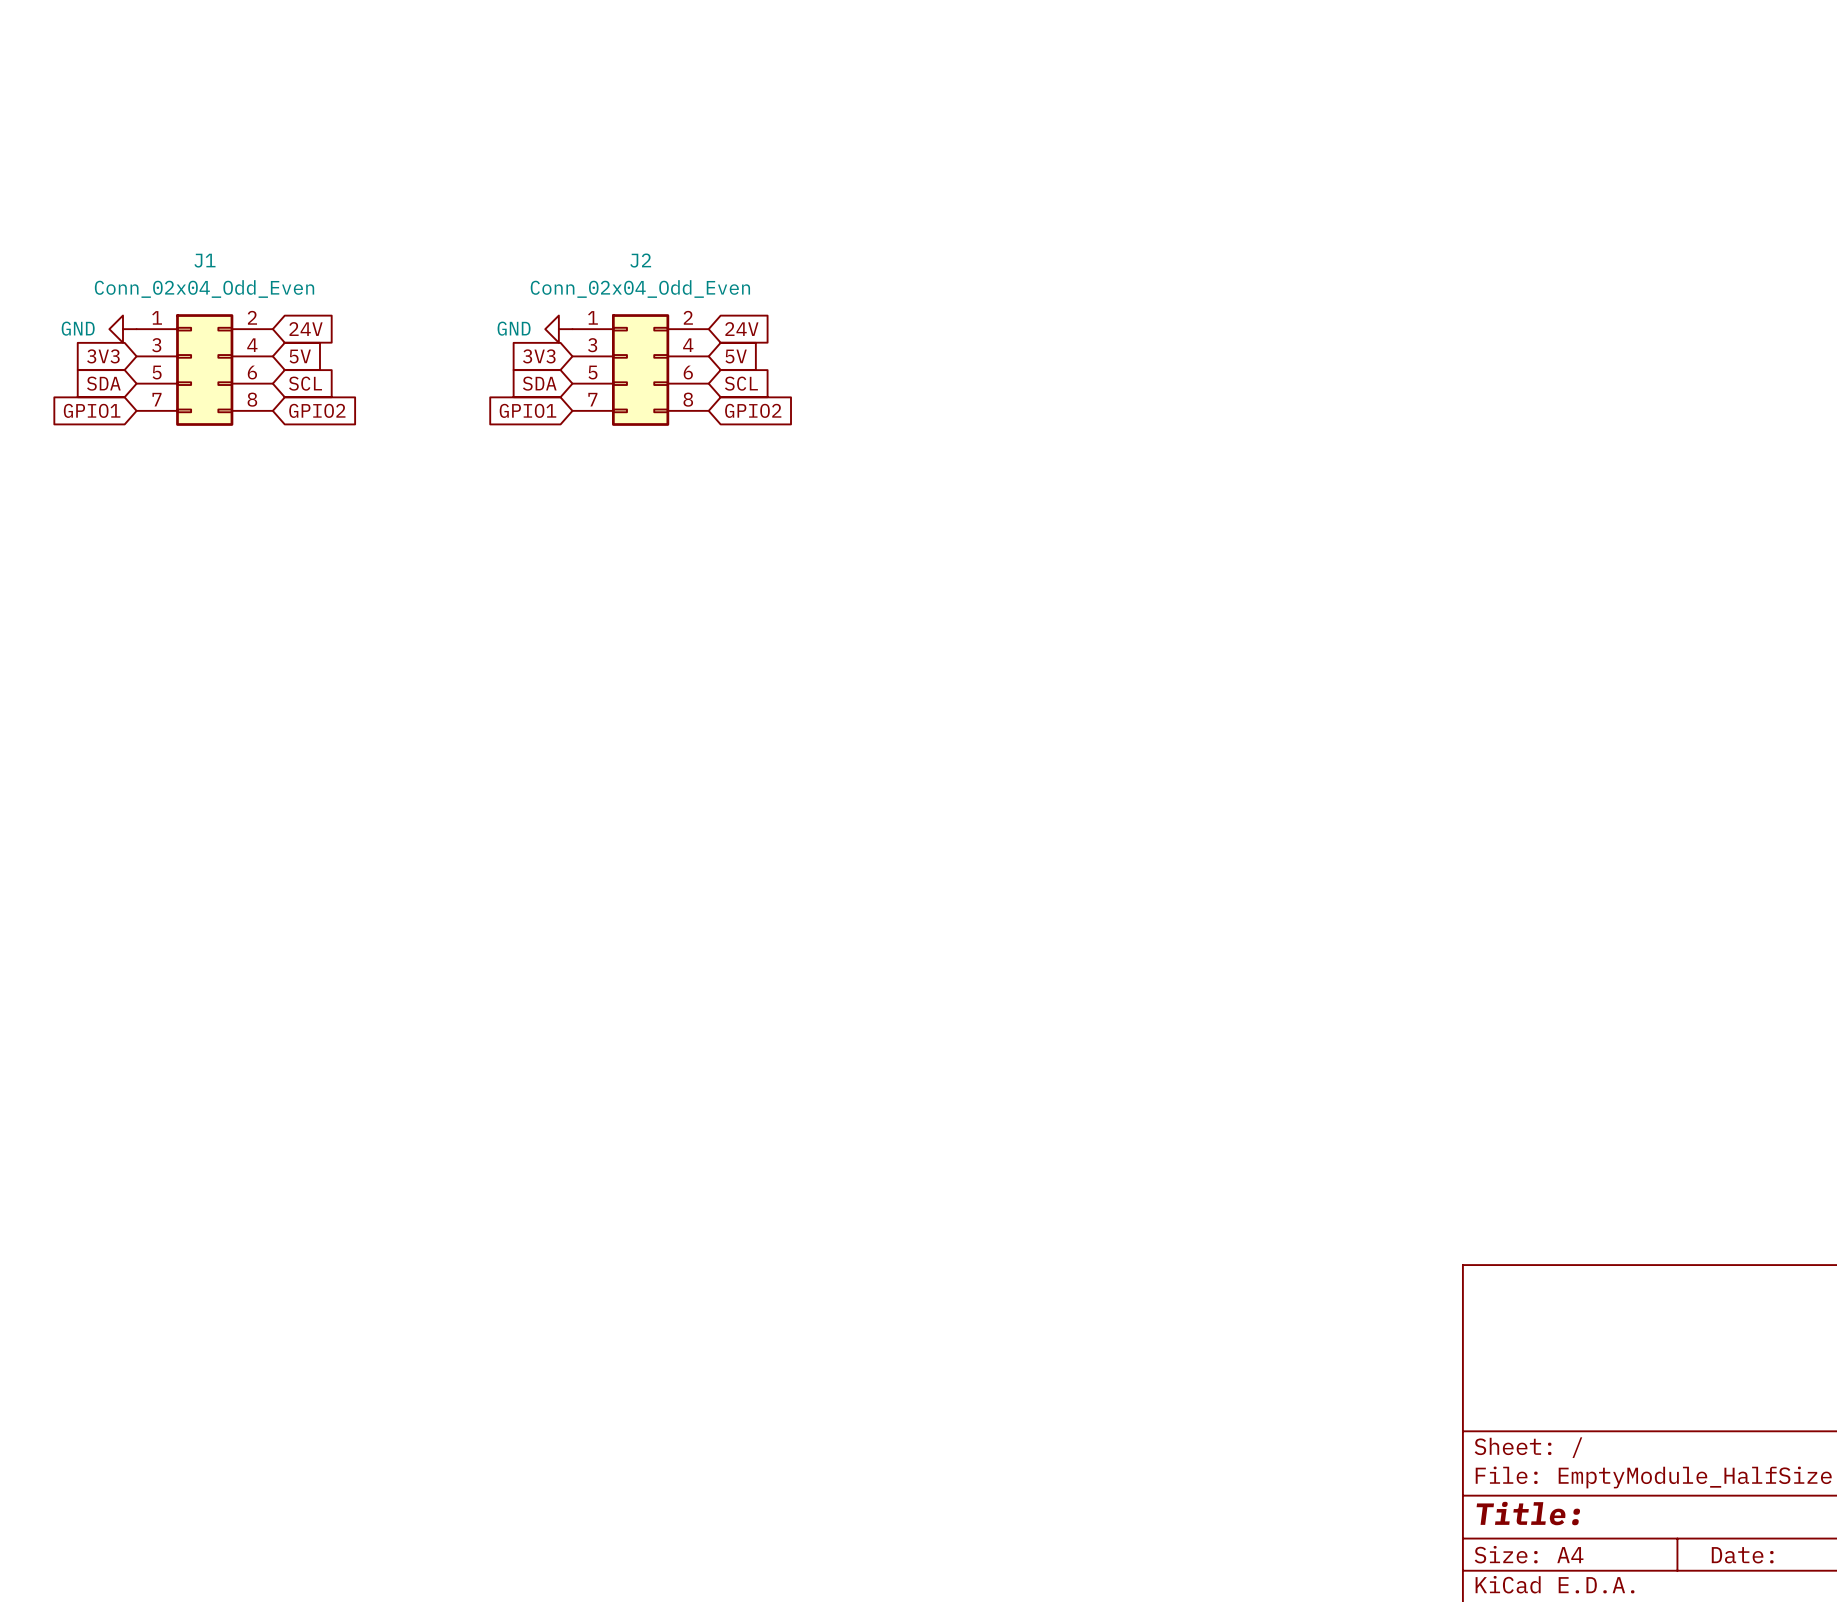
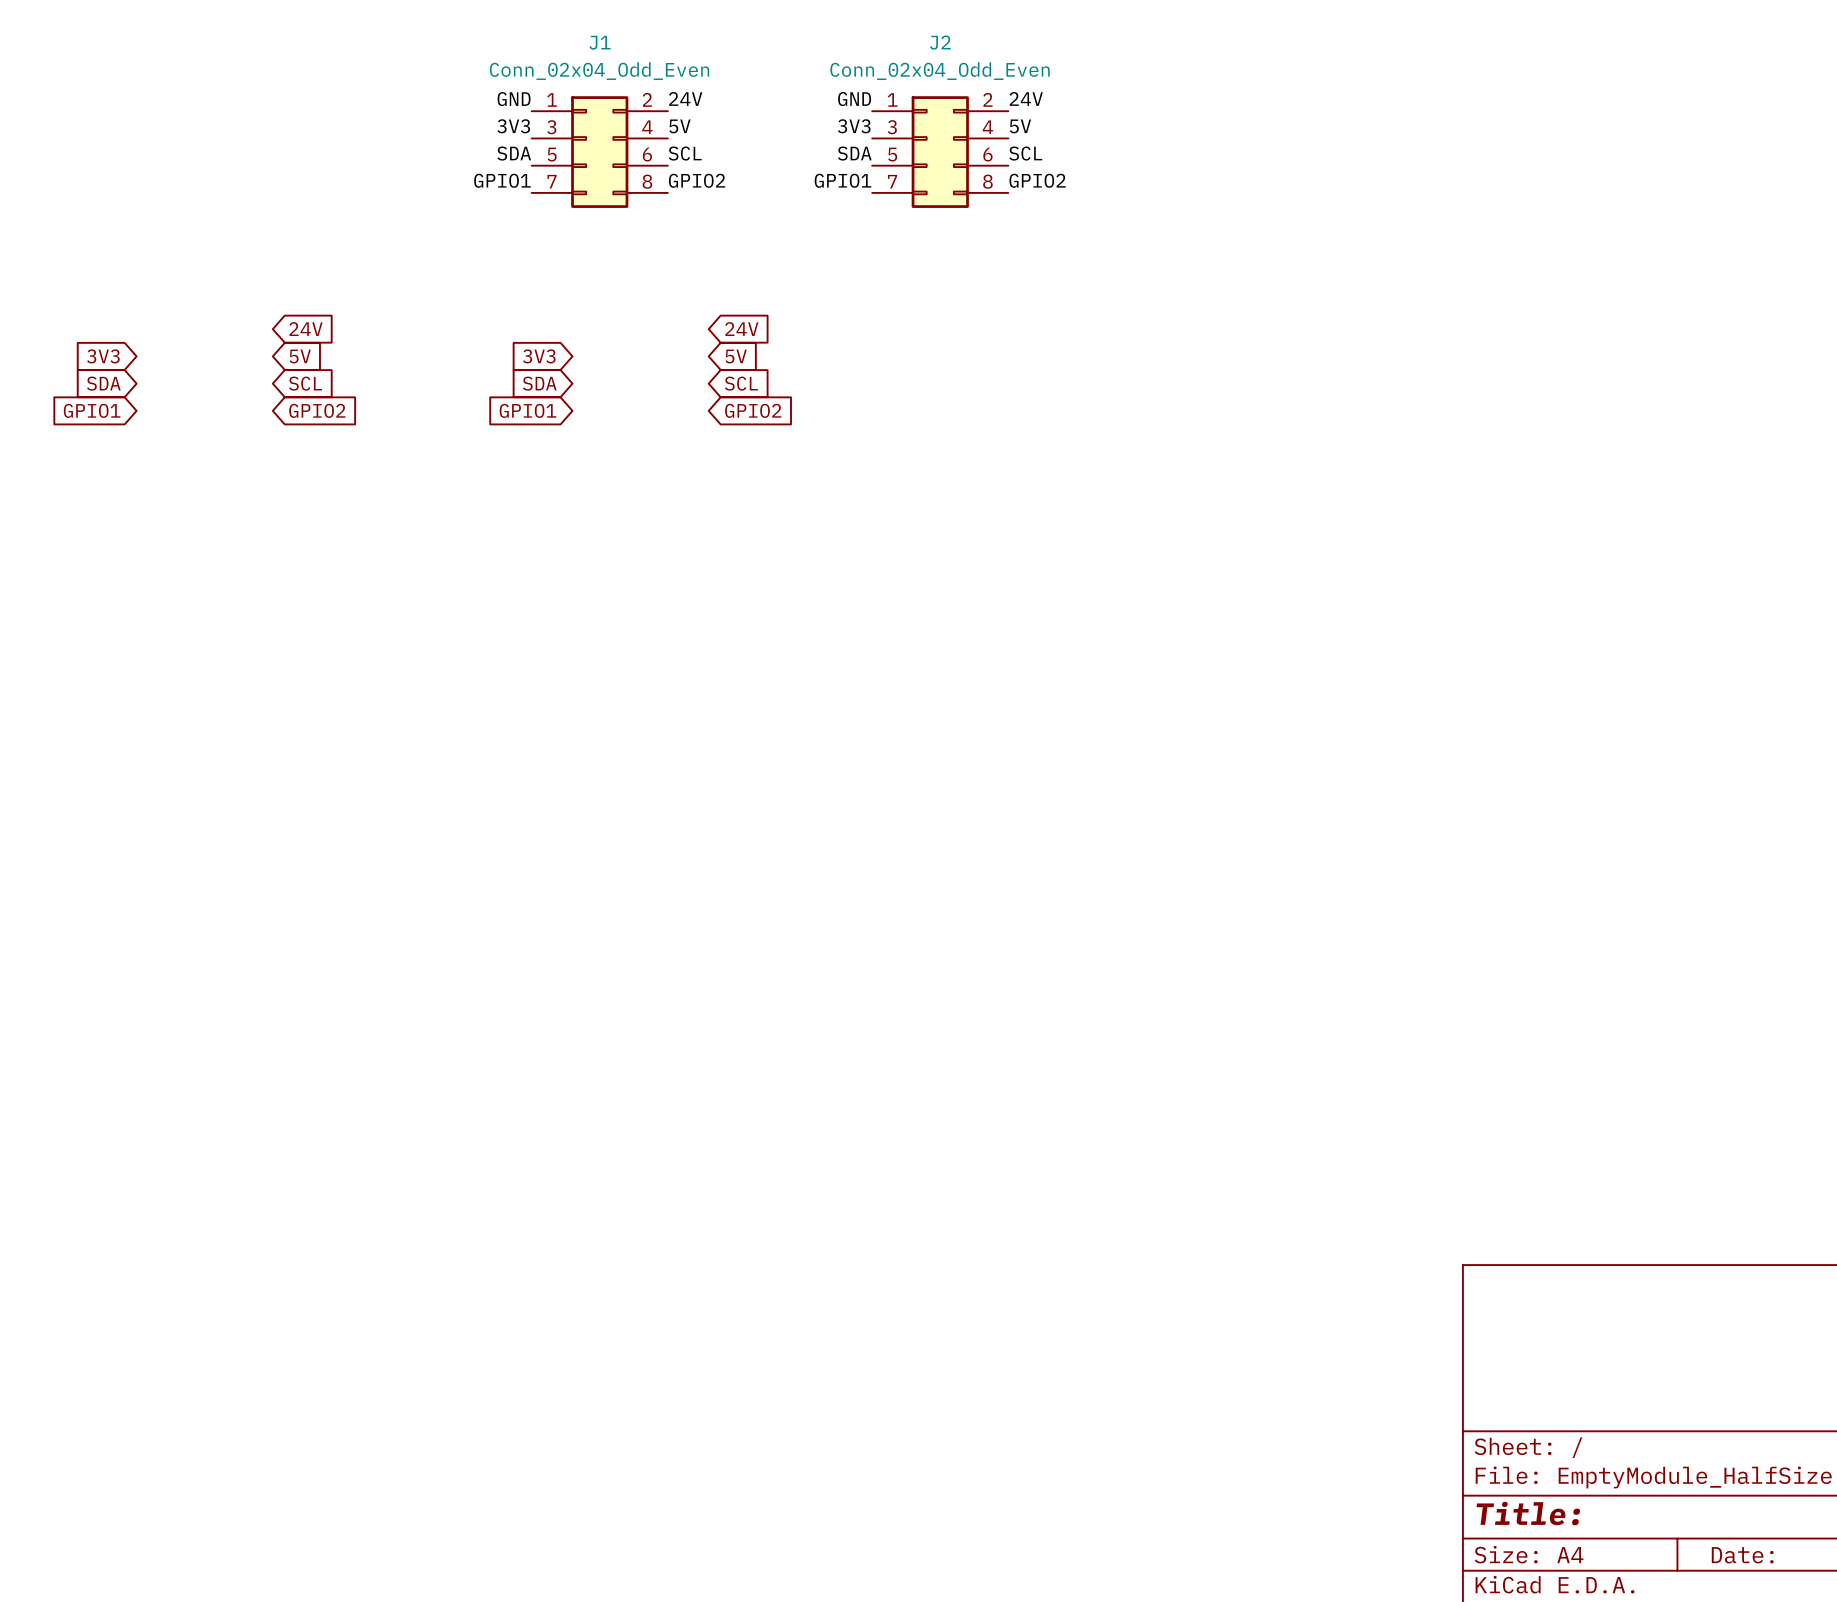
label: none -> 24V (685, 98)
label: none -> 24V (1026, 98)
label: none -> GND (514, 99)
label: none -> GND (854, 99)
label: none -> 3V3 (513, 126)
label: none -> 5V (679, 126)
label: none -> 3V3 (854, 126)
label: none -> 5V (1020, 126)
label: none -> SDA (514, 153)
label: none -> SCL (685, 153)
label: none -> SDA (854, 153)
label: none -> SCL (1025, 153)
label: none -> GPIO1 (502, 180)
label: none -> GPIO2 (697, 180)
label: none -> GPIO1 (842, 180)
label: none -> GPIO2 (1037, 180)
power symbol: GND (122, 329) -> none
power symbol: GND (558, 329) -> none
J1 position: (204, 370) -> (599, 152)
J2 position: (640, 370) -> (940, 152)

